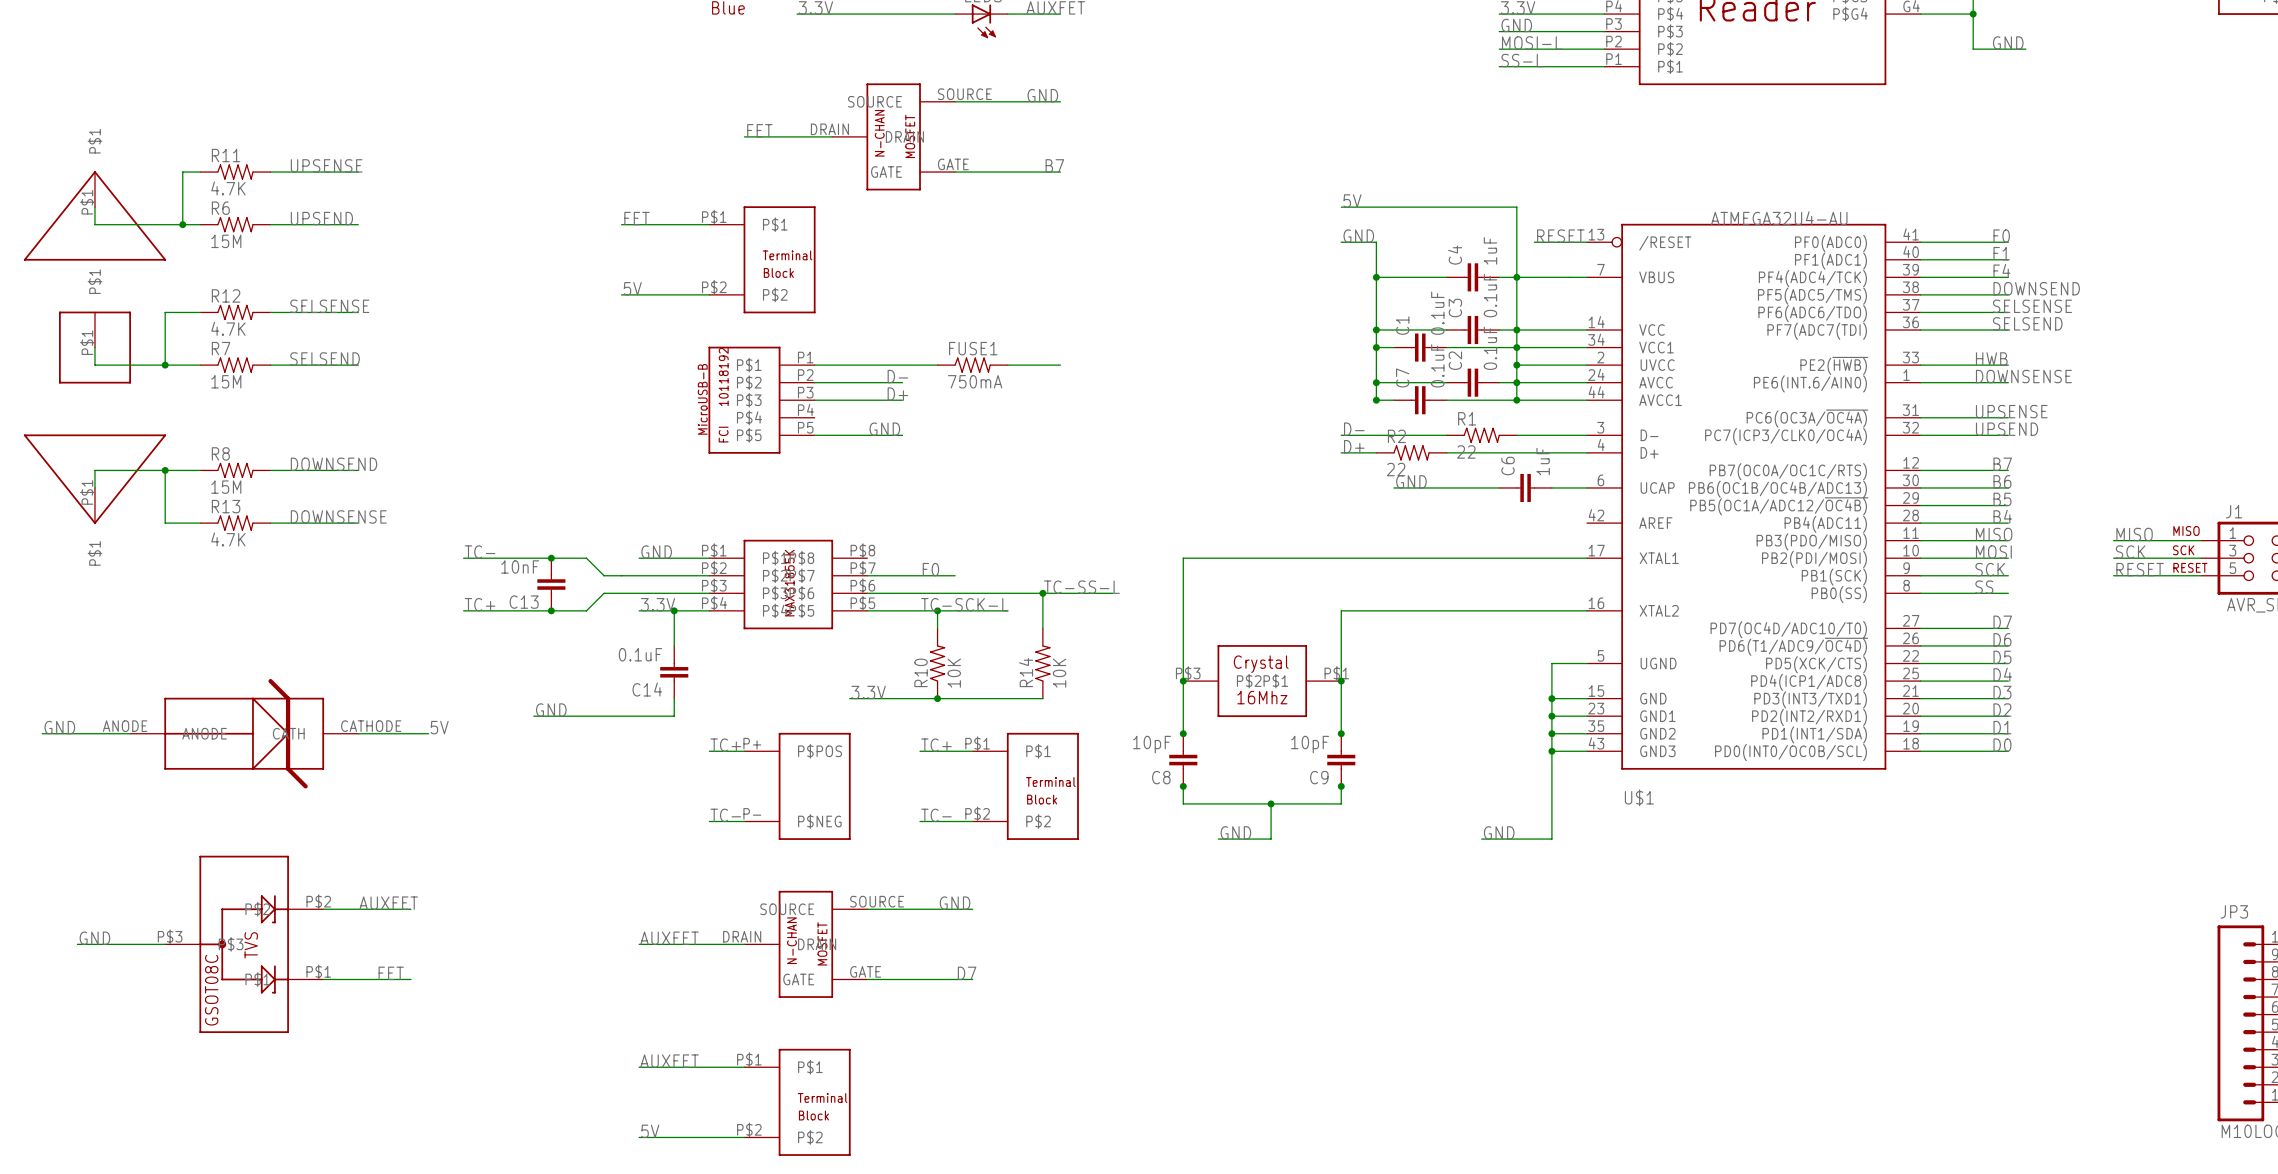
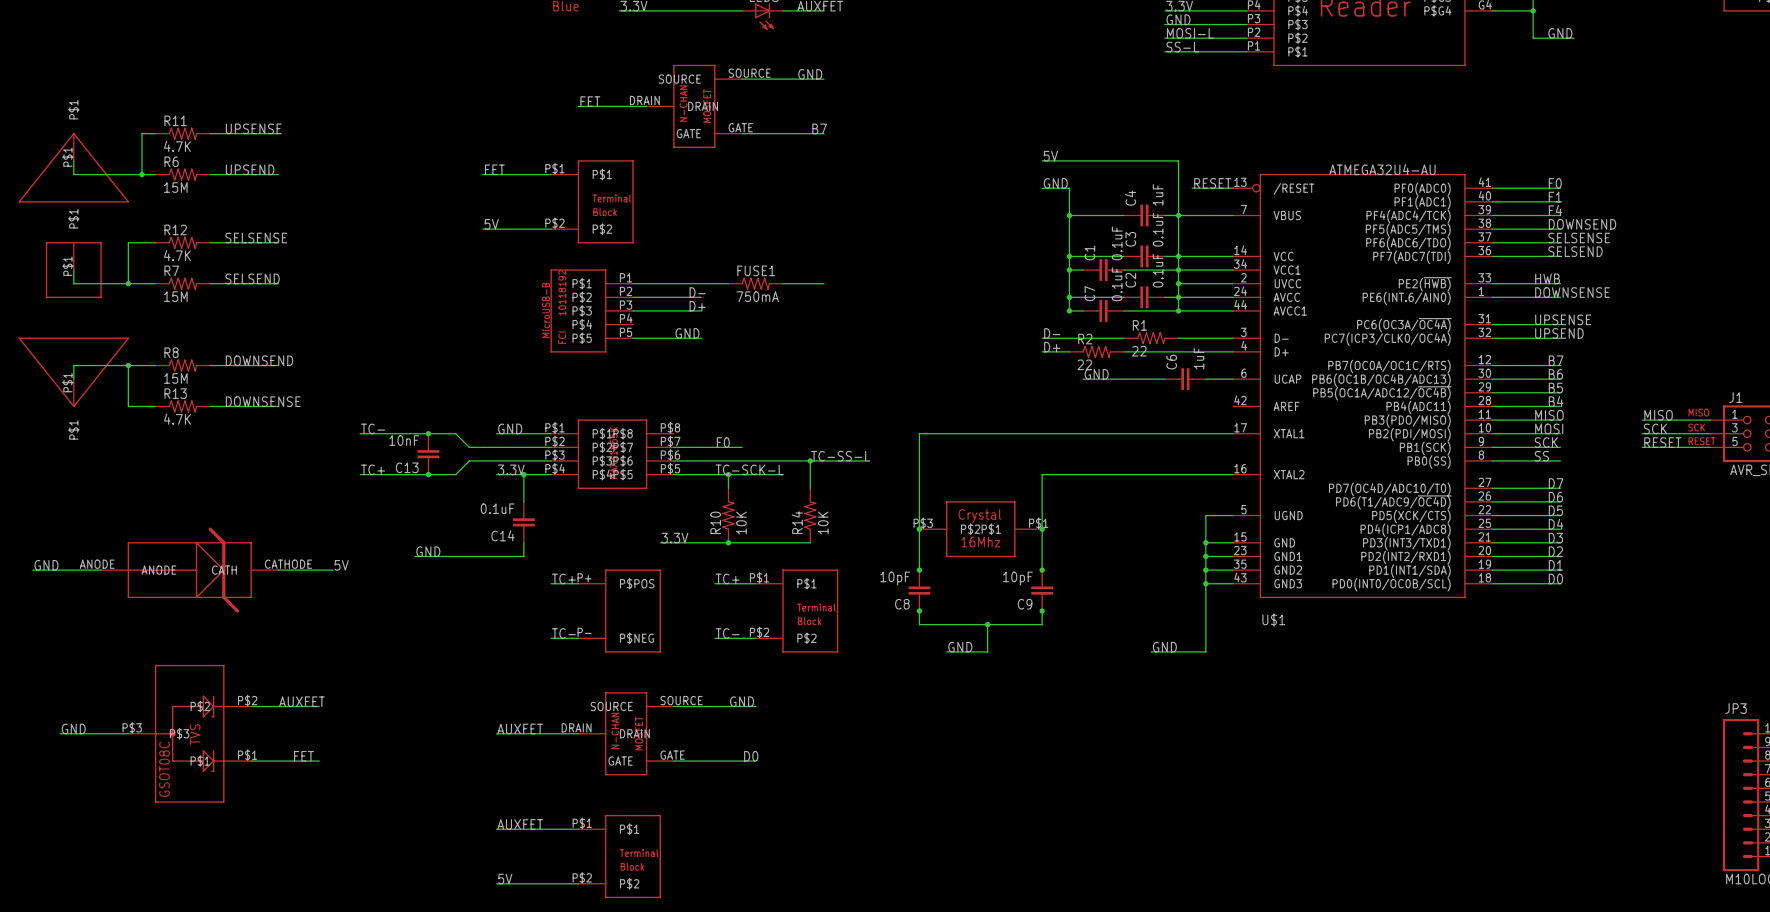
label: D7 (967, 973) -> D0 (751, 756)

